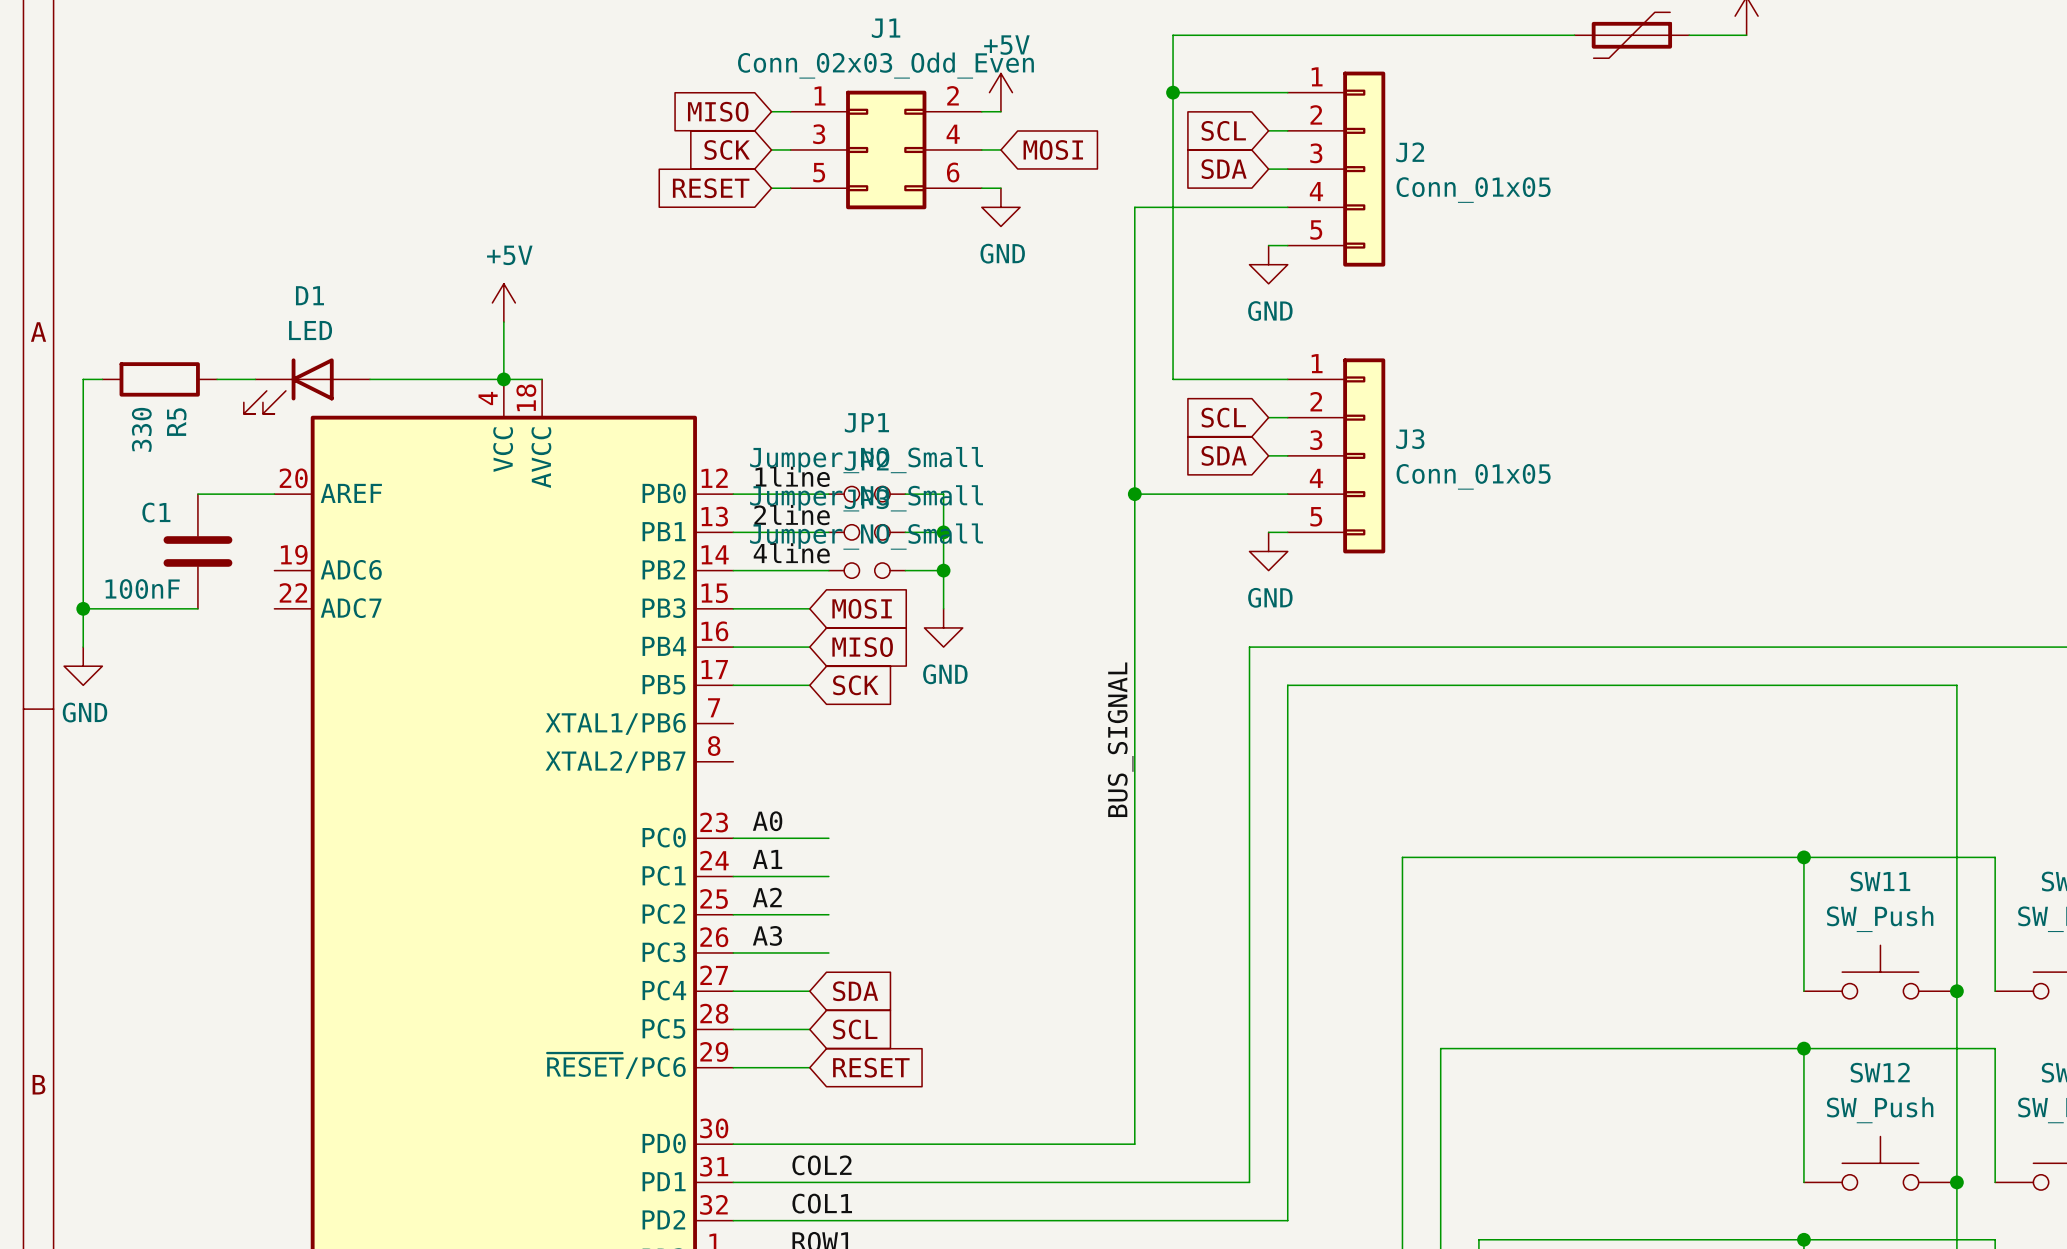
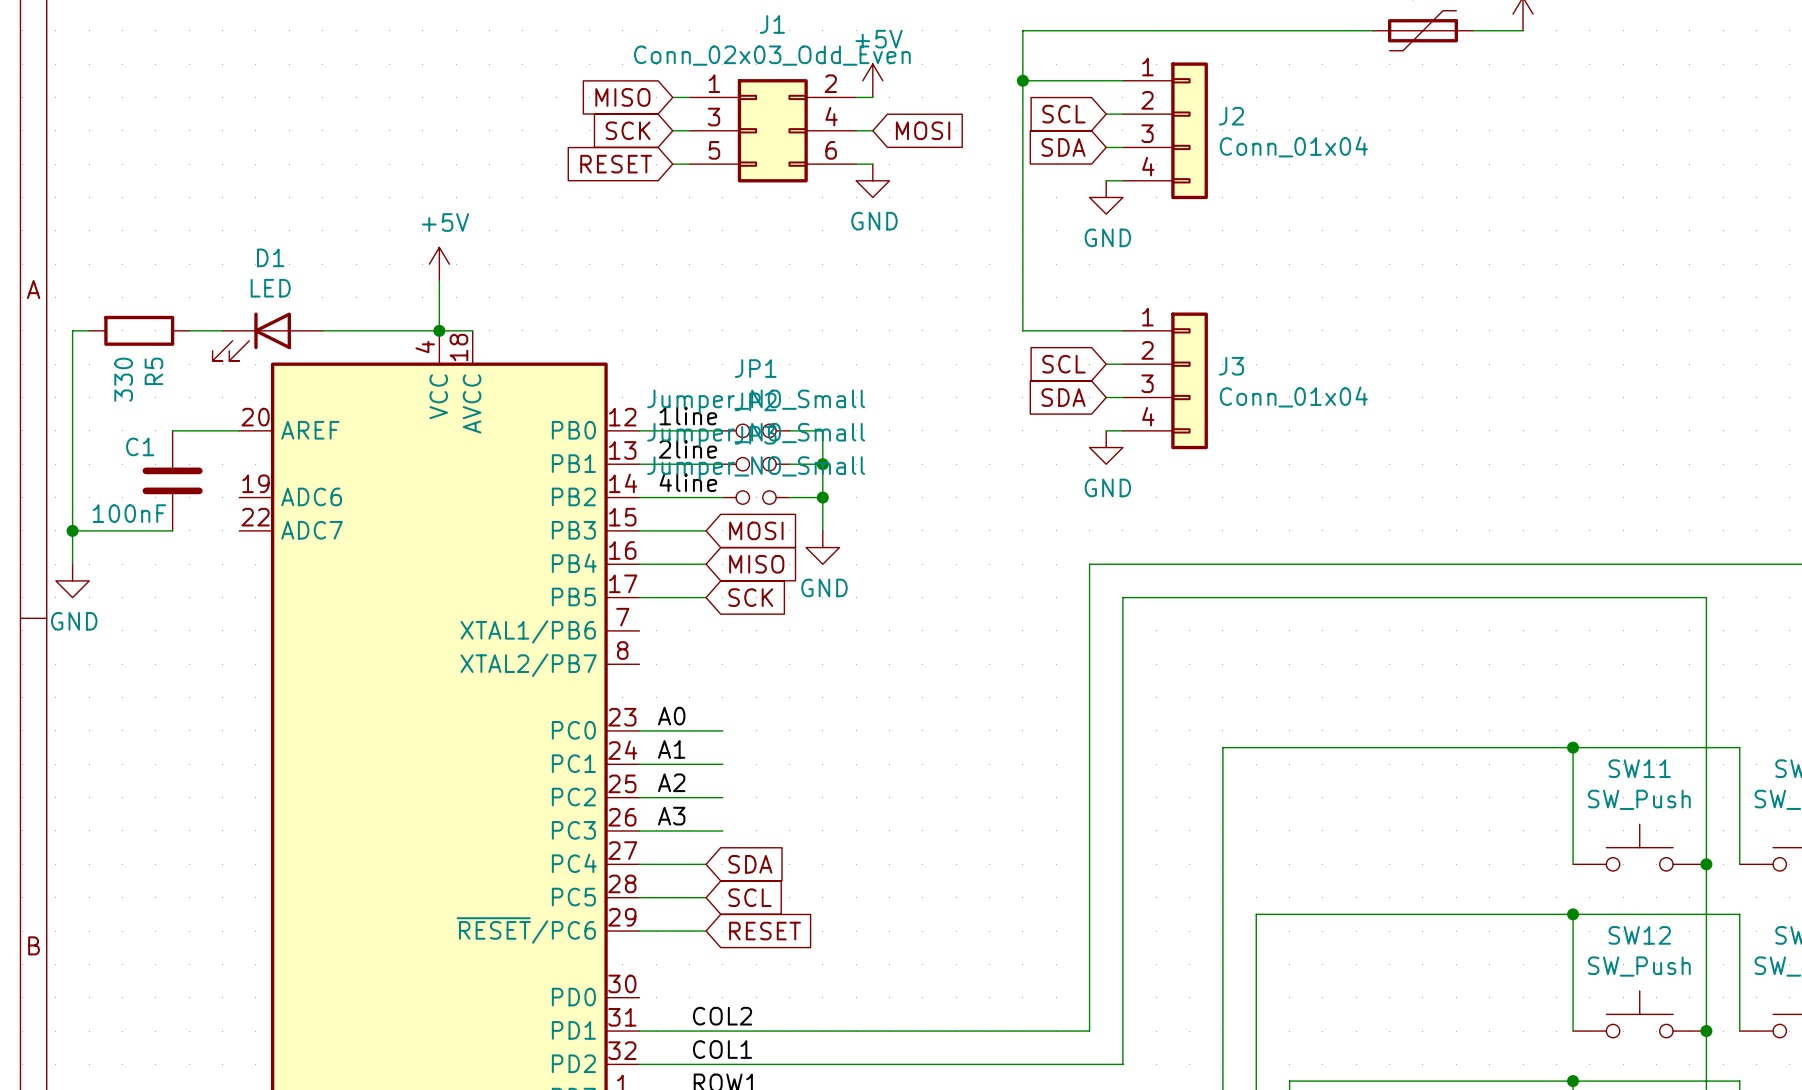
J2 symbol: [1287, 71, 1386, 267] -> [1122, 62, 1208, 200]
J2 value: Conn_01x05 (1473, 190) -> Conn_01x04 (1293, 146)
wire: (1268, 207) (1134, 207) (1134, 1144) (733, 1144) -> none
wire: (1268, 245) (1287, 245) -> none
power symbol position: GND (1268, 264) -> GND (1106, 197)
J3 symbol: [1287, 358, 1386, 554] -> [1122, 312, 1208, 450]
J3 value: Conn_01x05 (1473, 476) -> Conn_01x04 (1293, 396)
wire: (1134, 494) (1268, 494) -> none
junction: (1134, 494) -> none
wire: (1268, 532) (1287, 532) -> none
power symbol position: GND (1268, 551) -> GND (1106, 447)
label: BUS_SIGNAL (1120, 739) -> none

